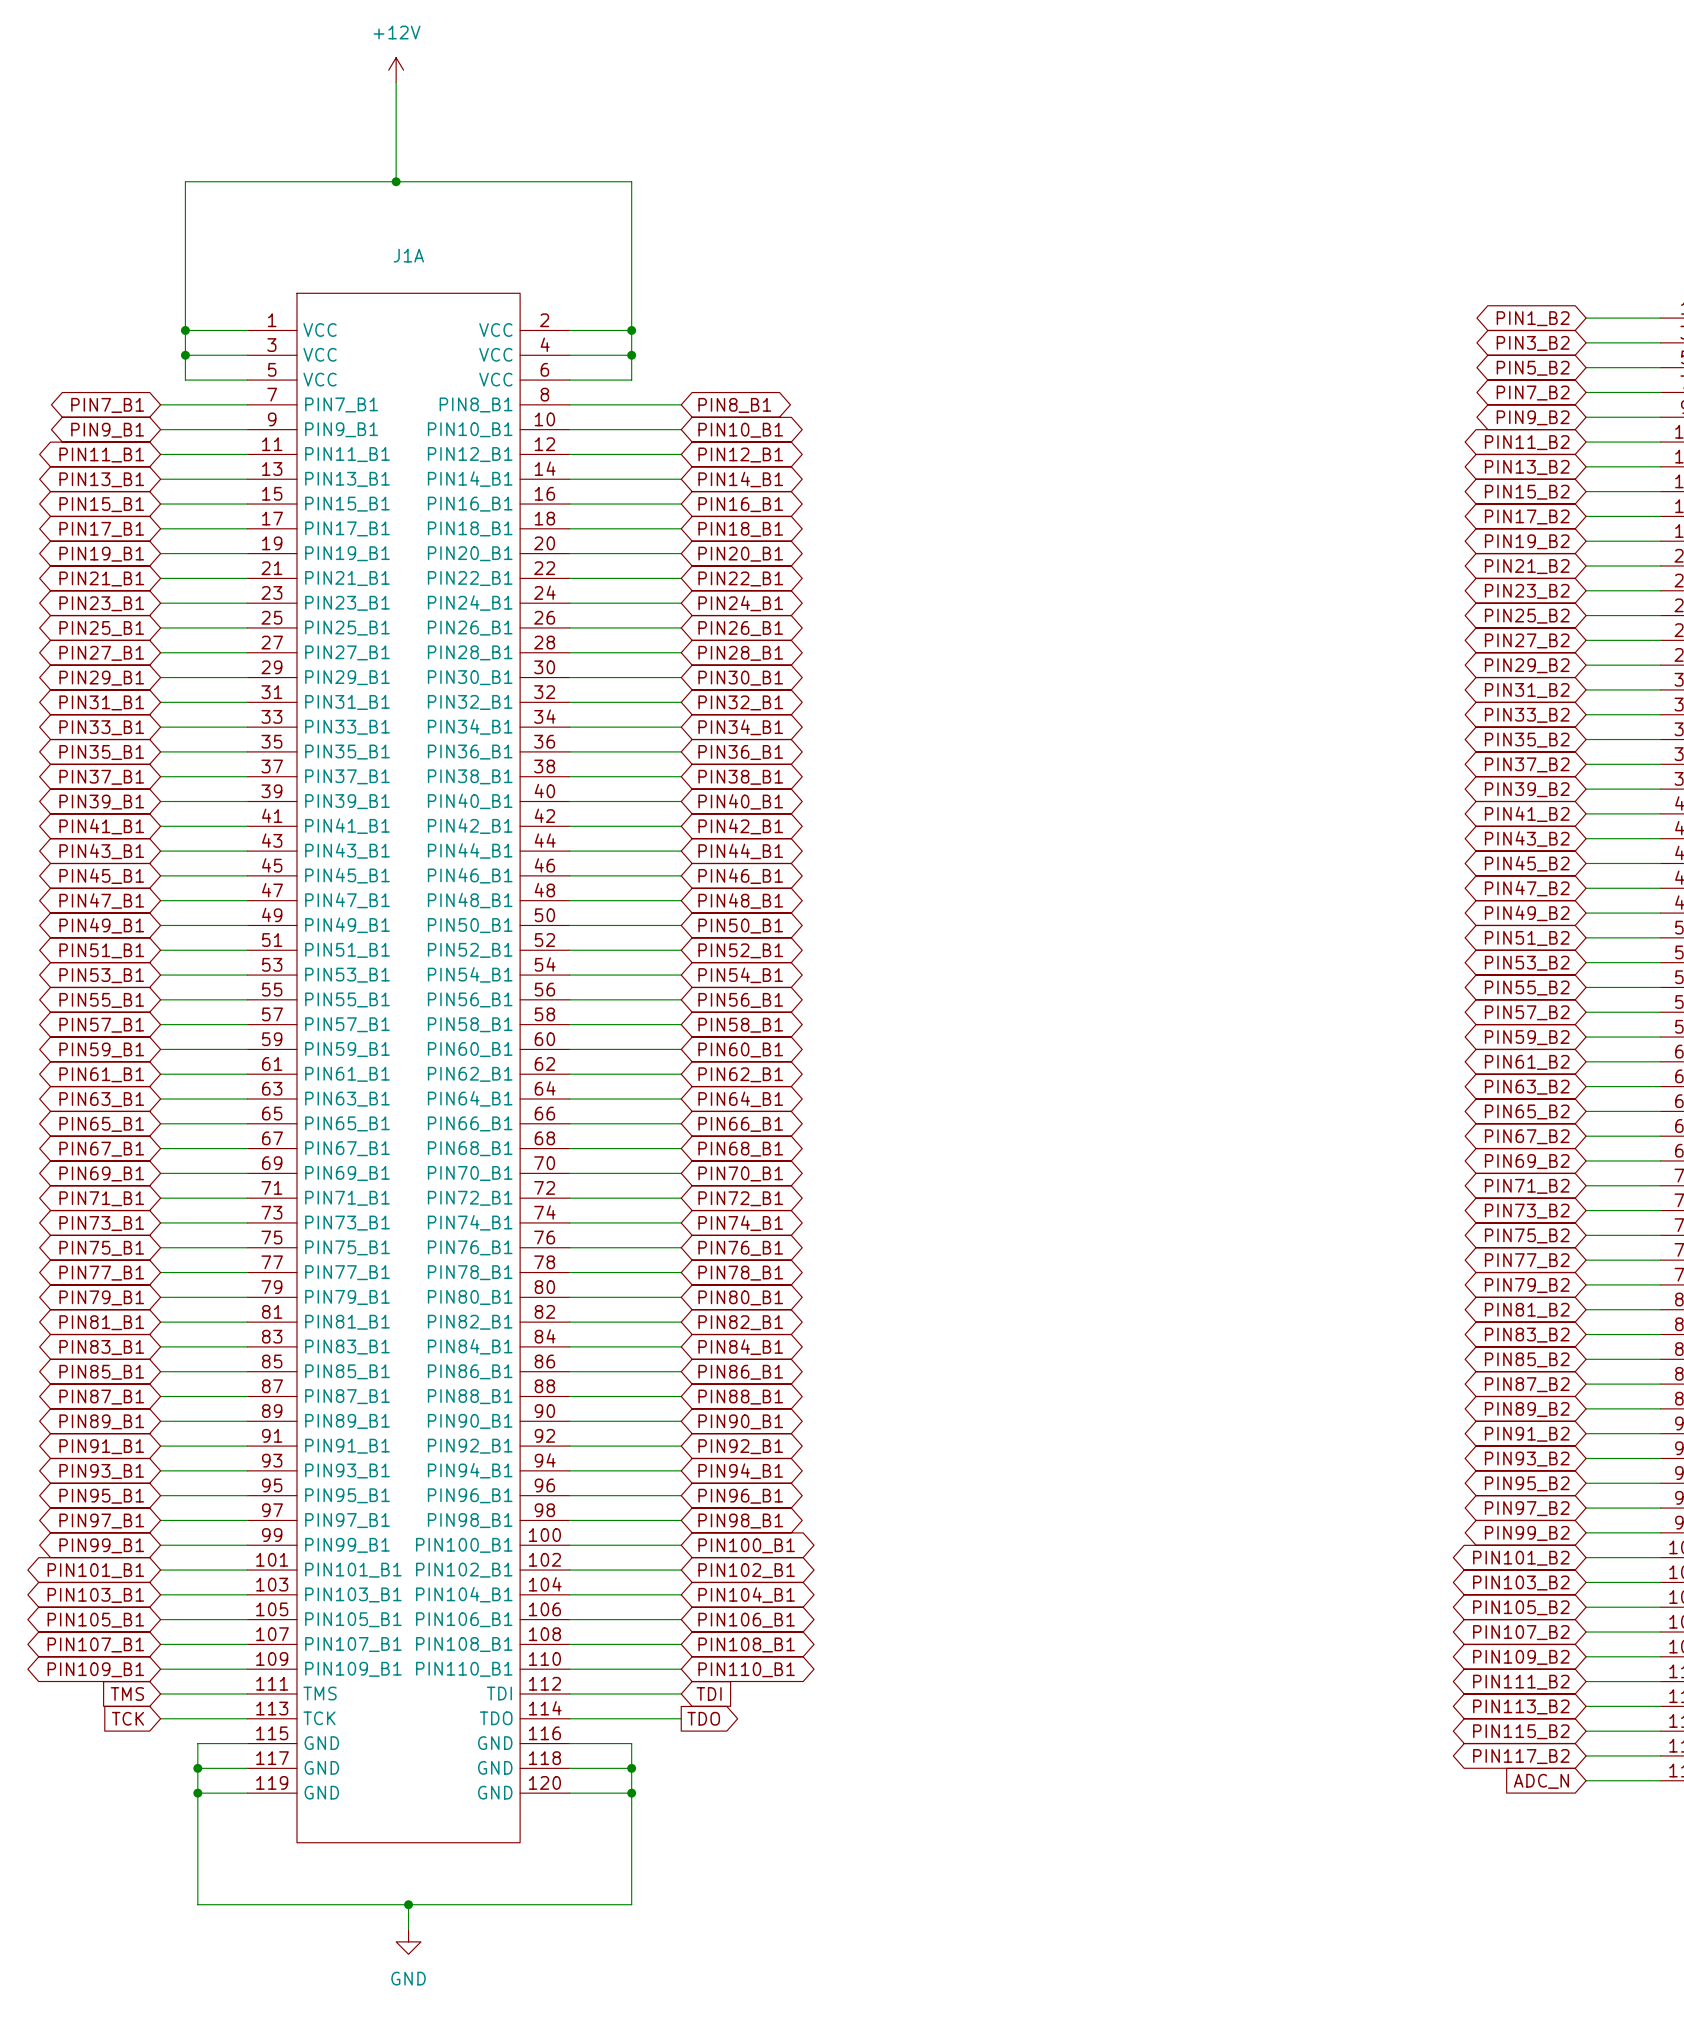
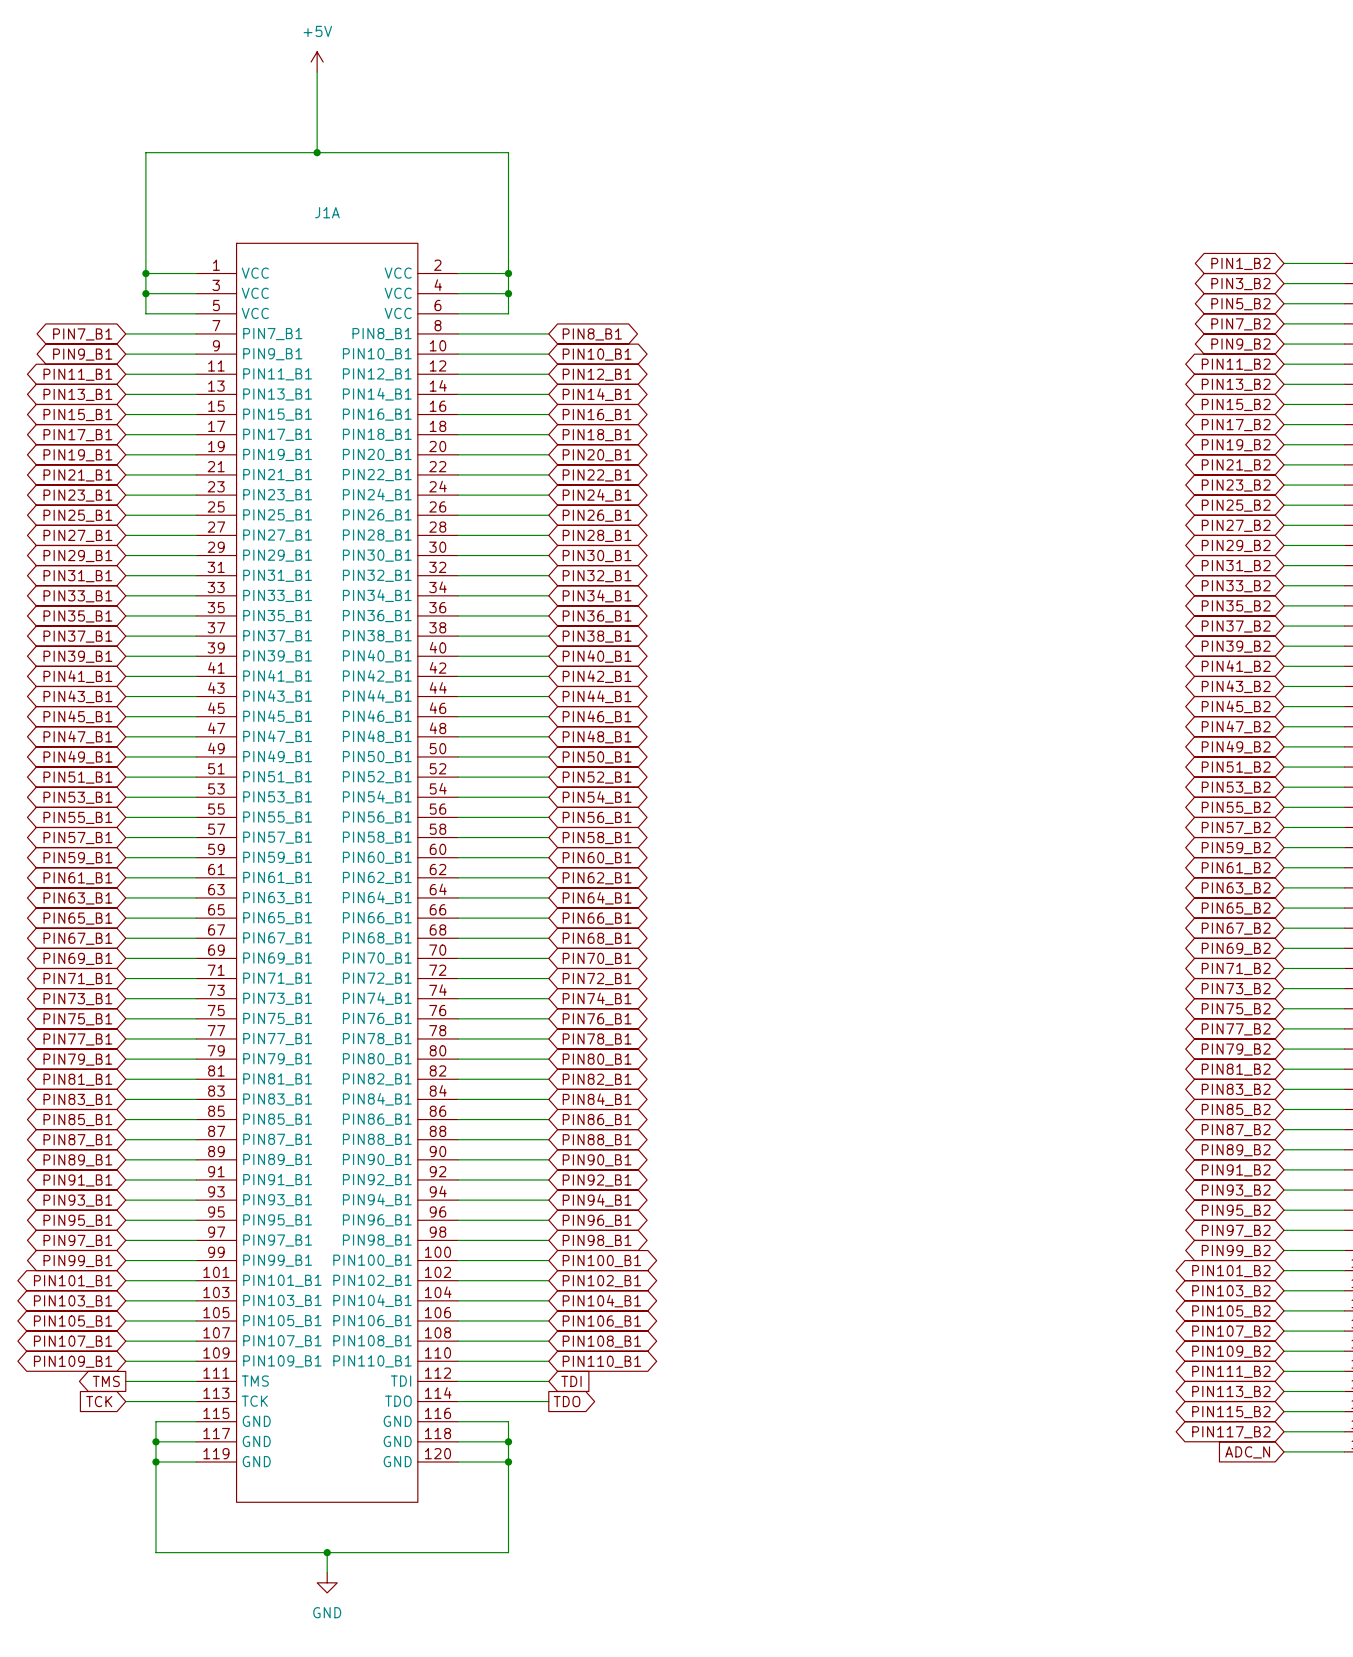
power symbol: +12V (396, 70) -> +5V (317, 62)
global label shape: input (127, 1693) -> output (106, 1381)

